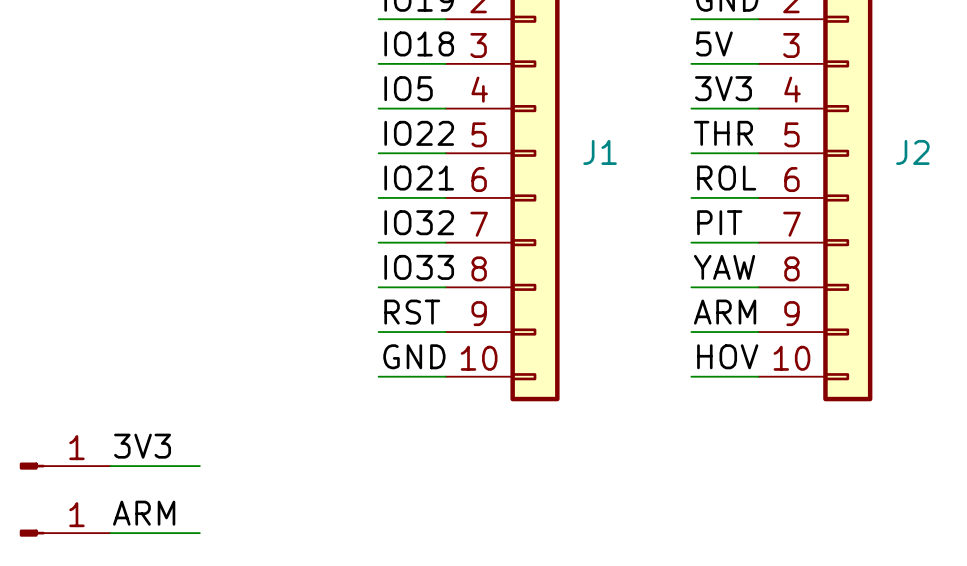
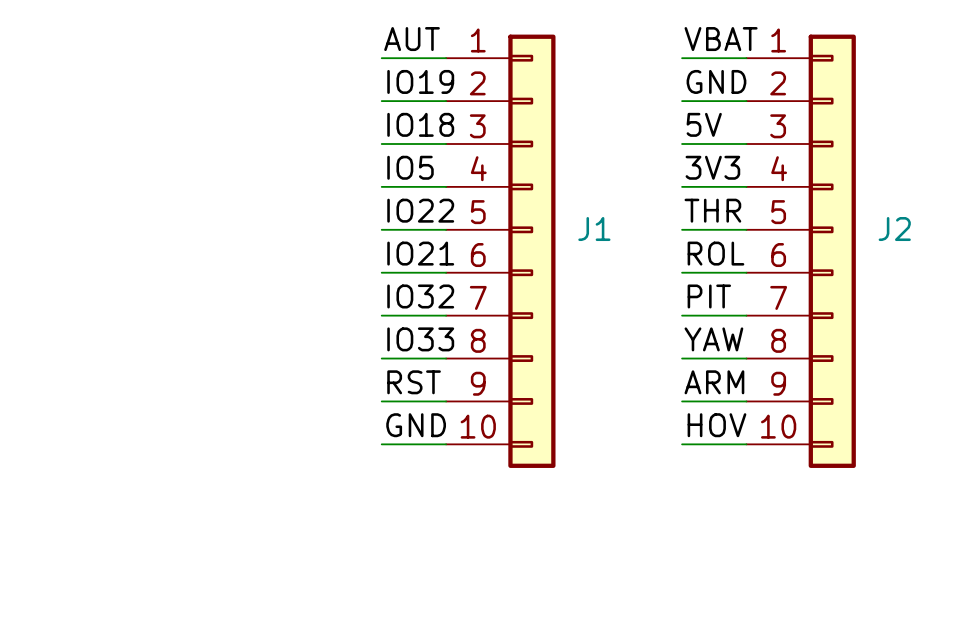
label: 3V3 (142, 446) -> none
part: (65, 466) -> none
wire: (110, 466) (199, 466) -> none
label: ARM (144, 513) -> none
part: (65, 533) -> none
wire: (110, 533) (199, 533) -> none

